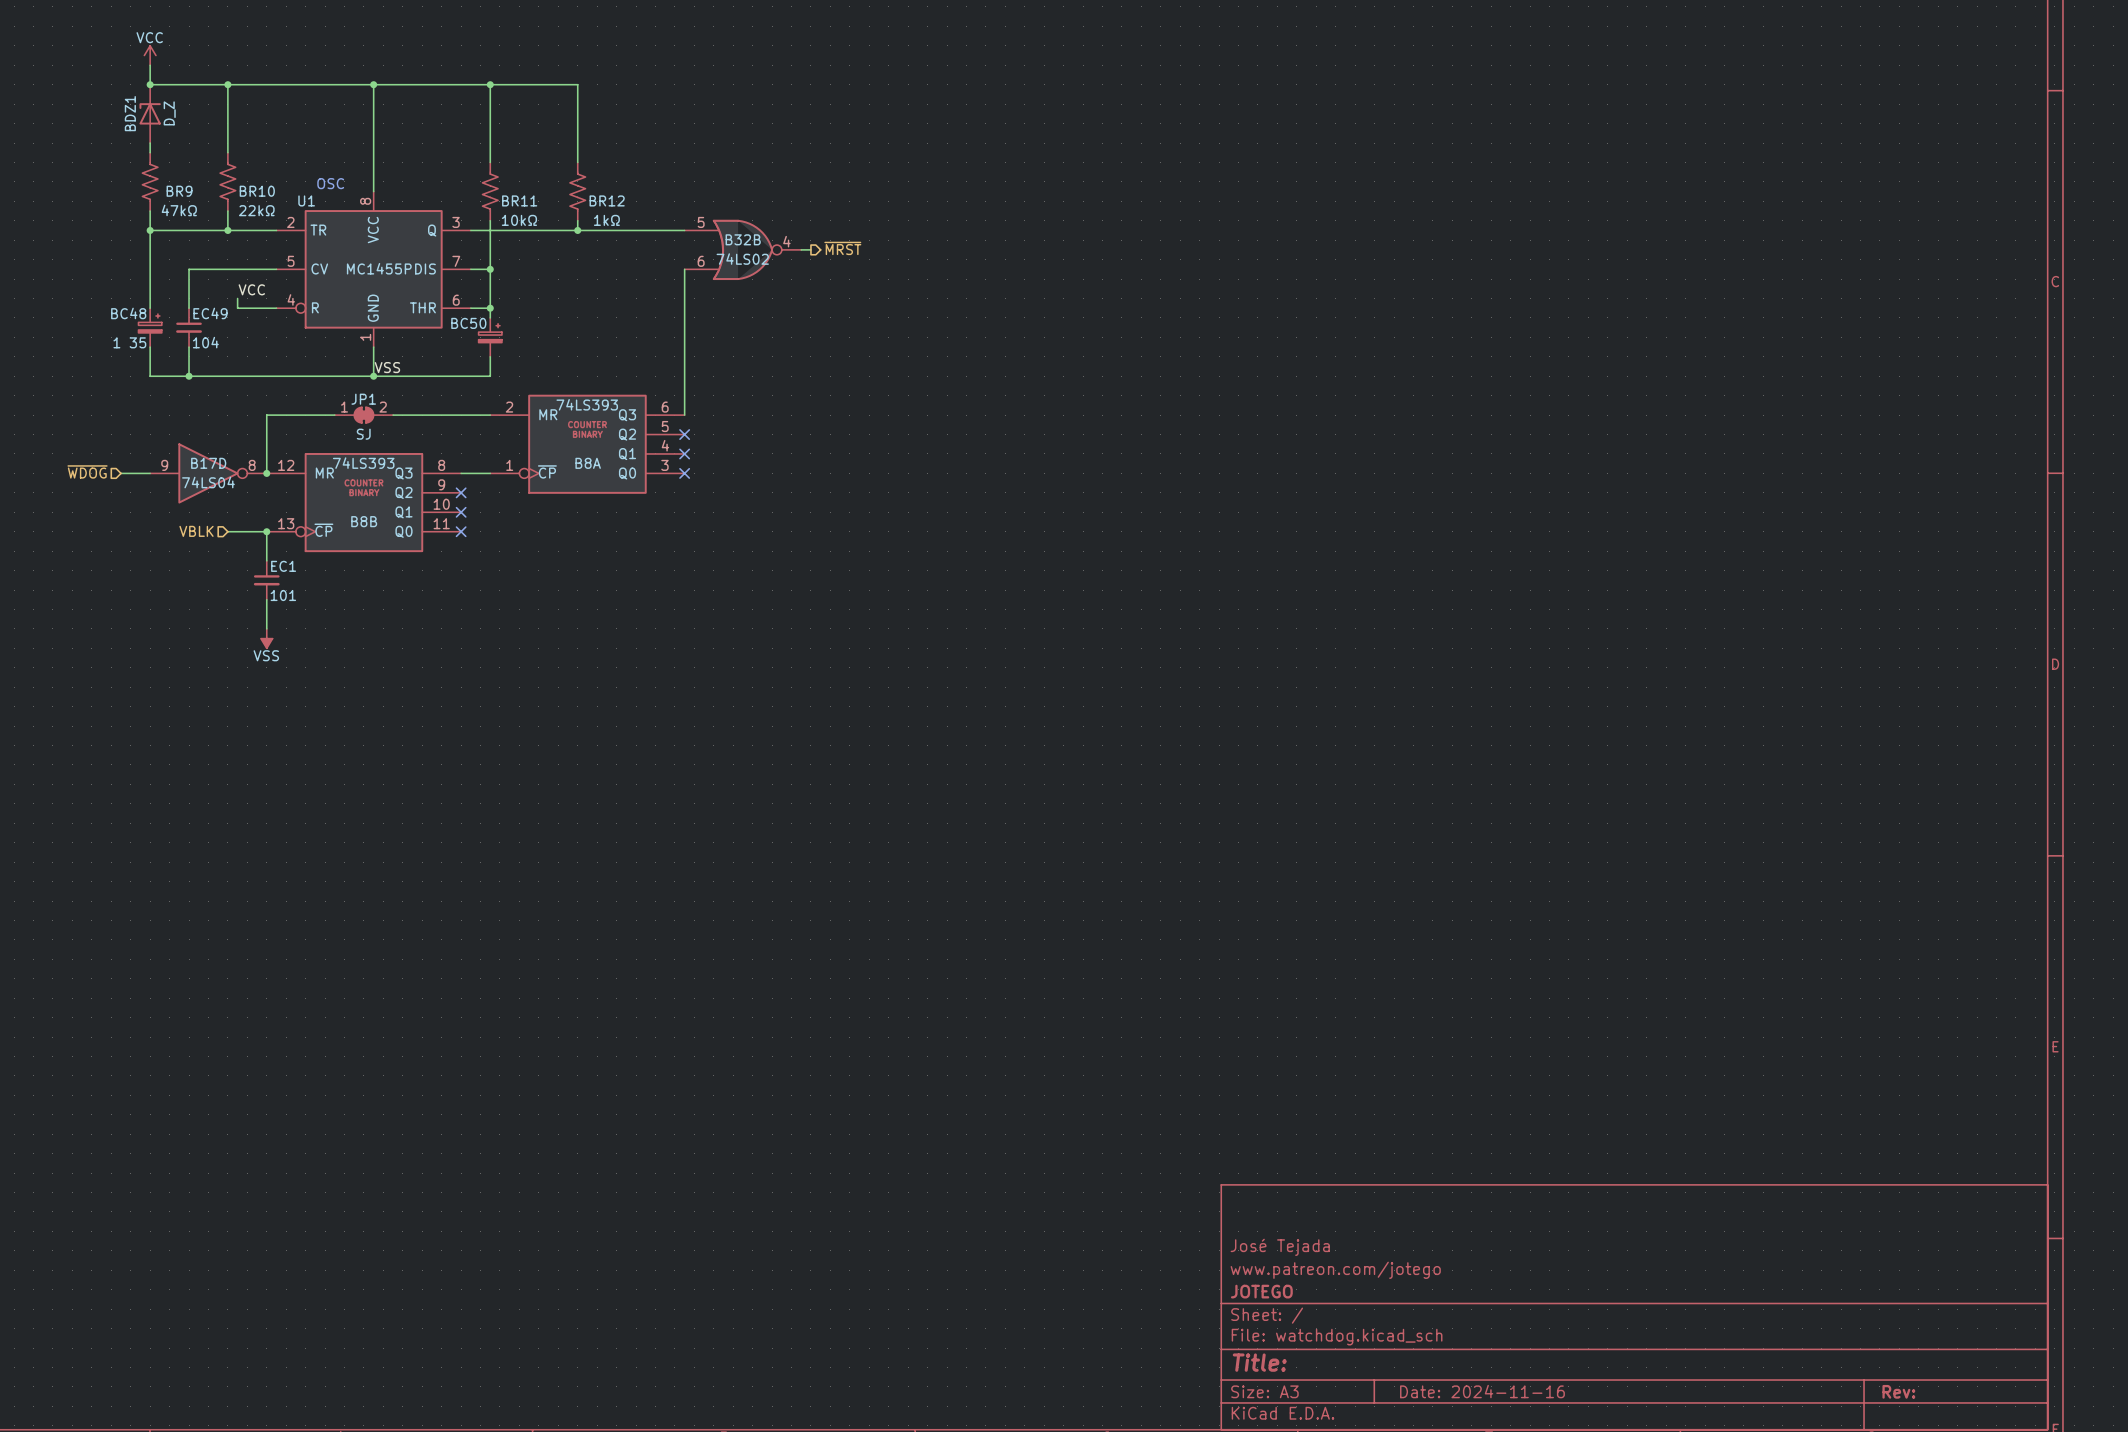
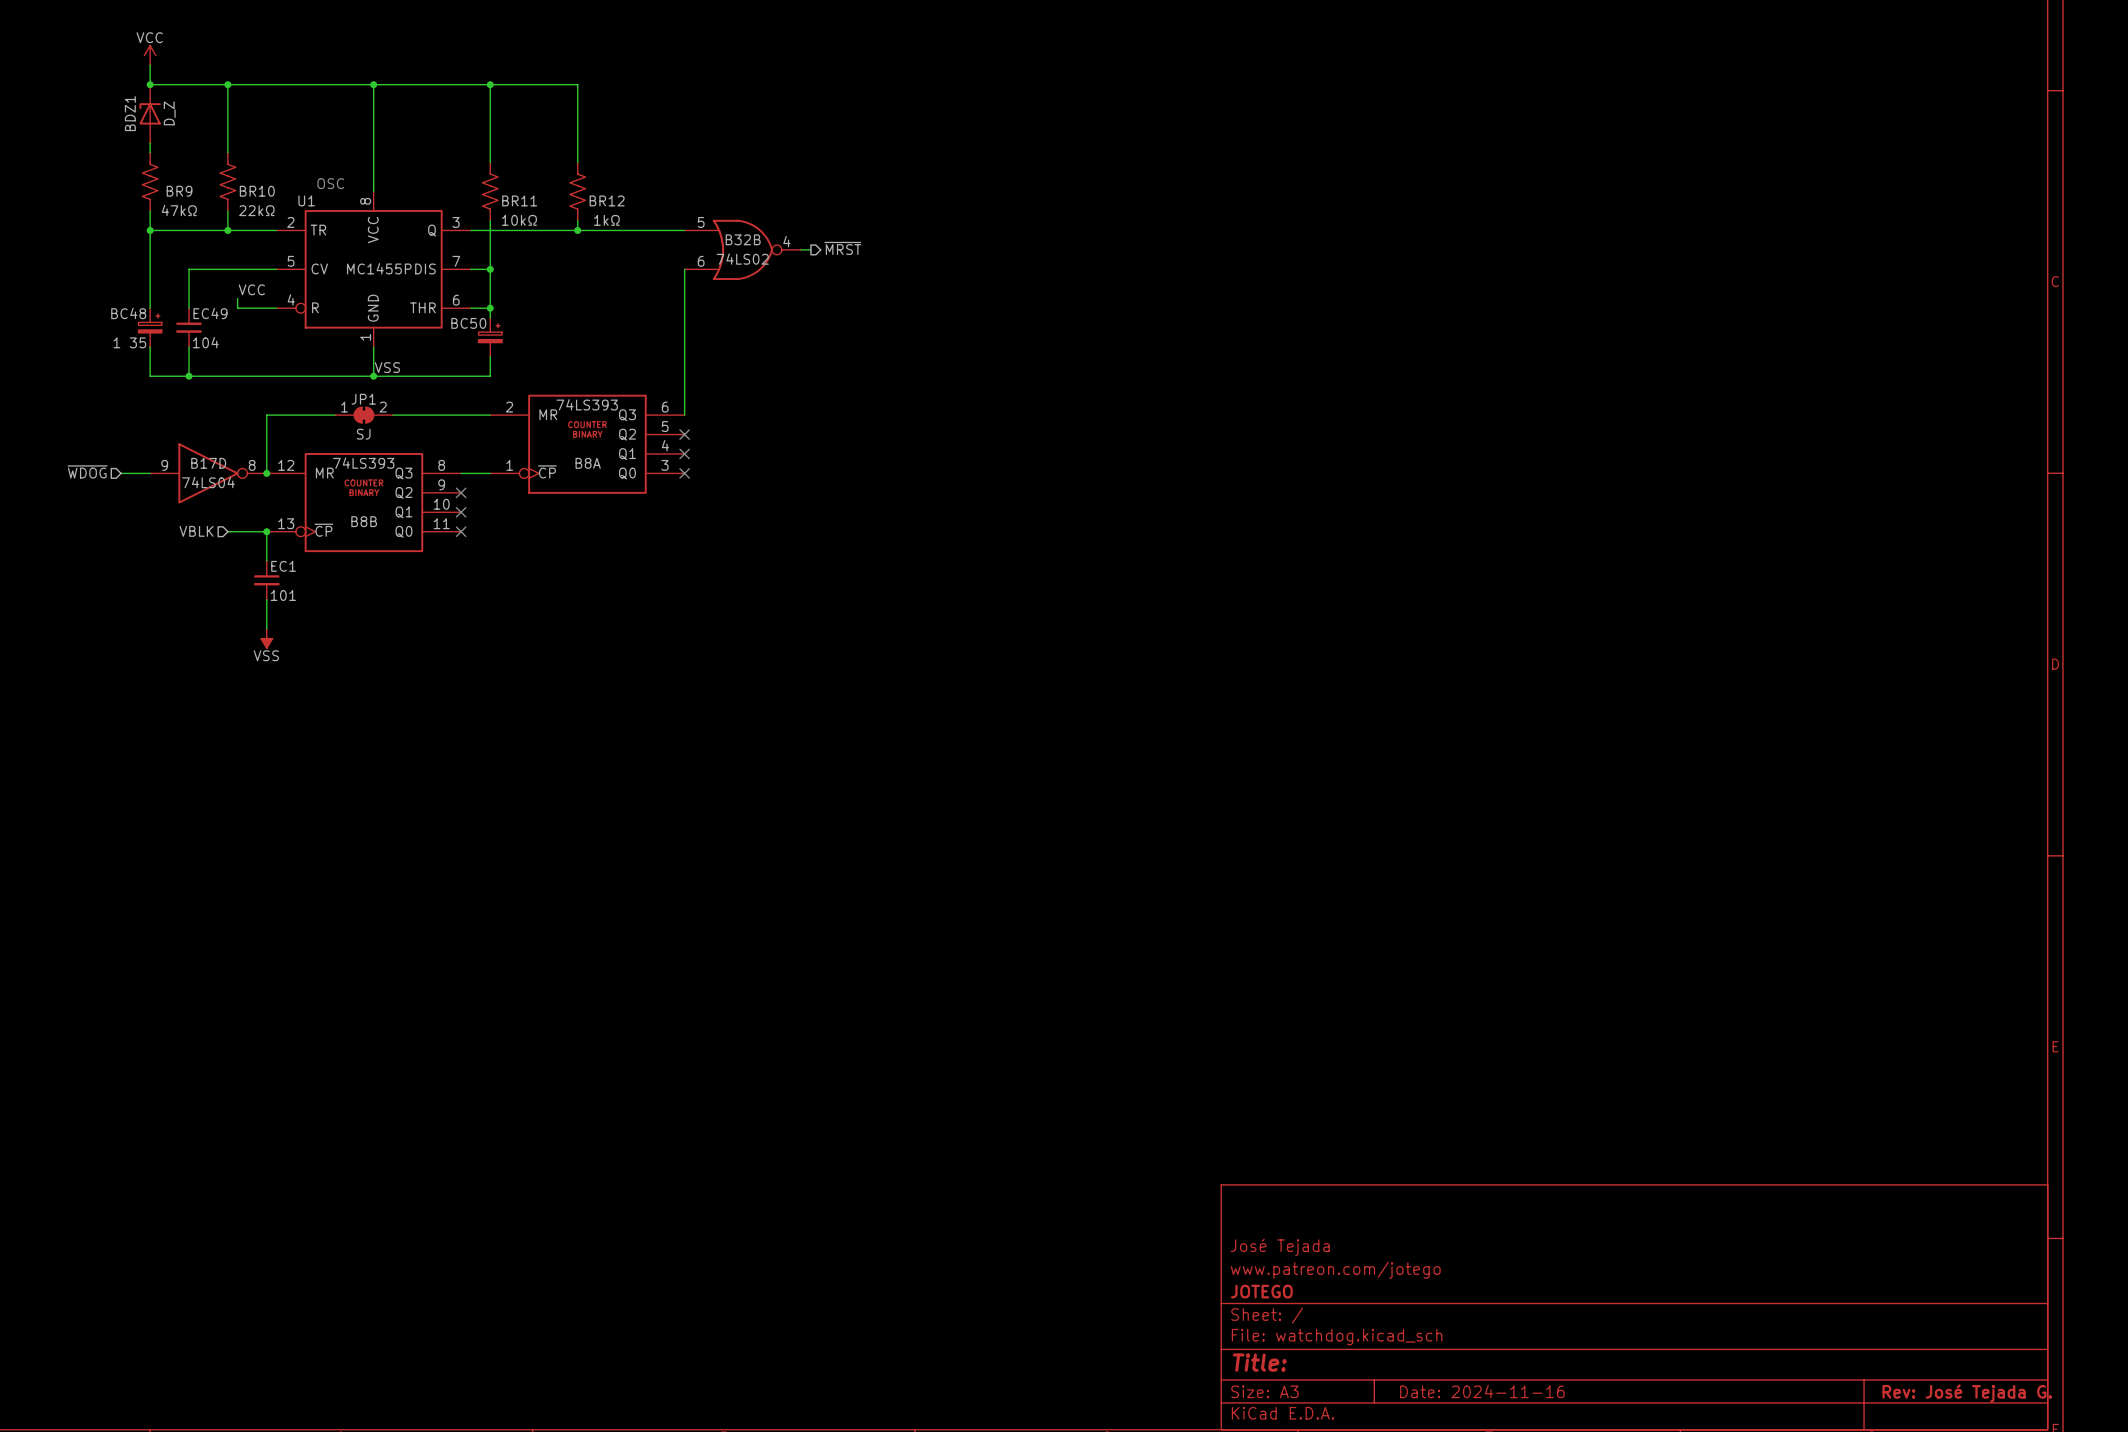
title block: Rev: (1898, 1391) -> Rev: José Tejada G. (1967, 1393)

